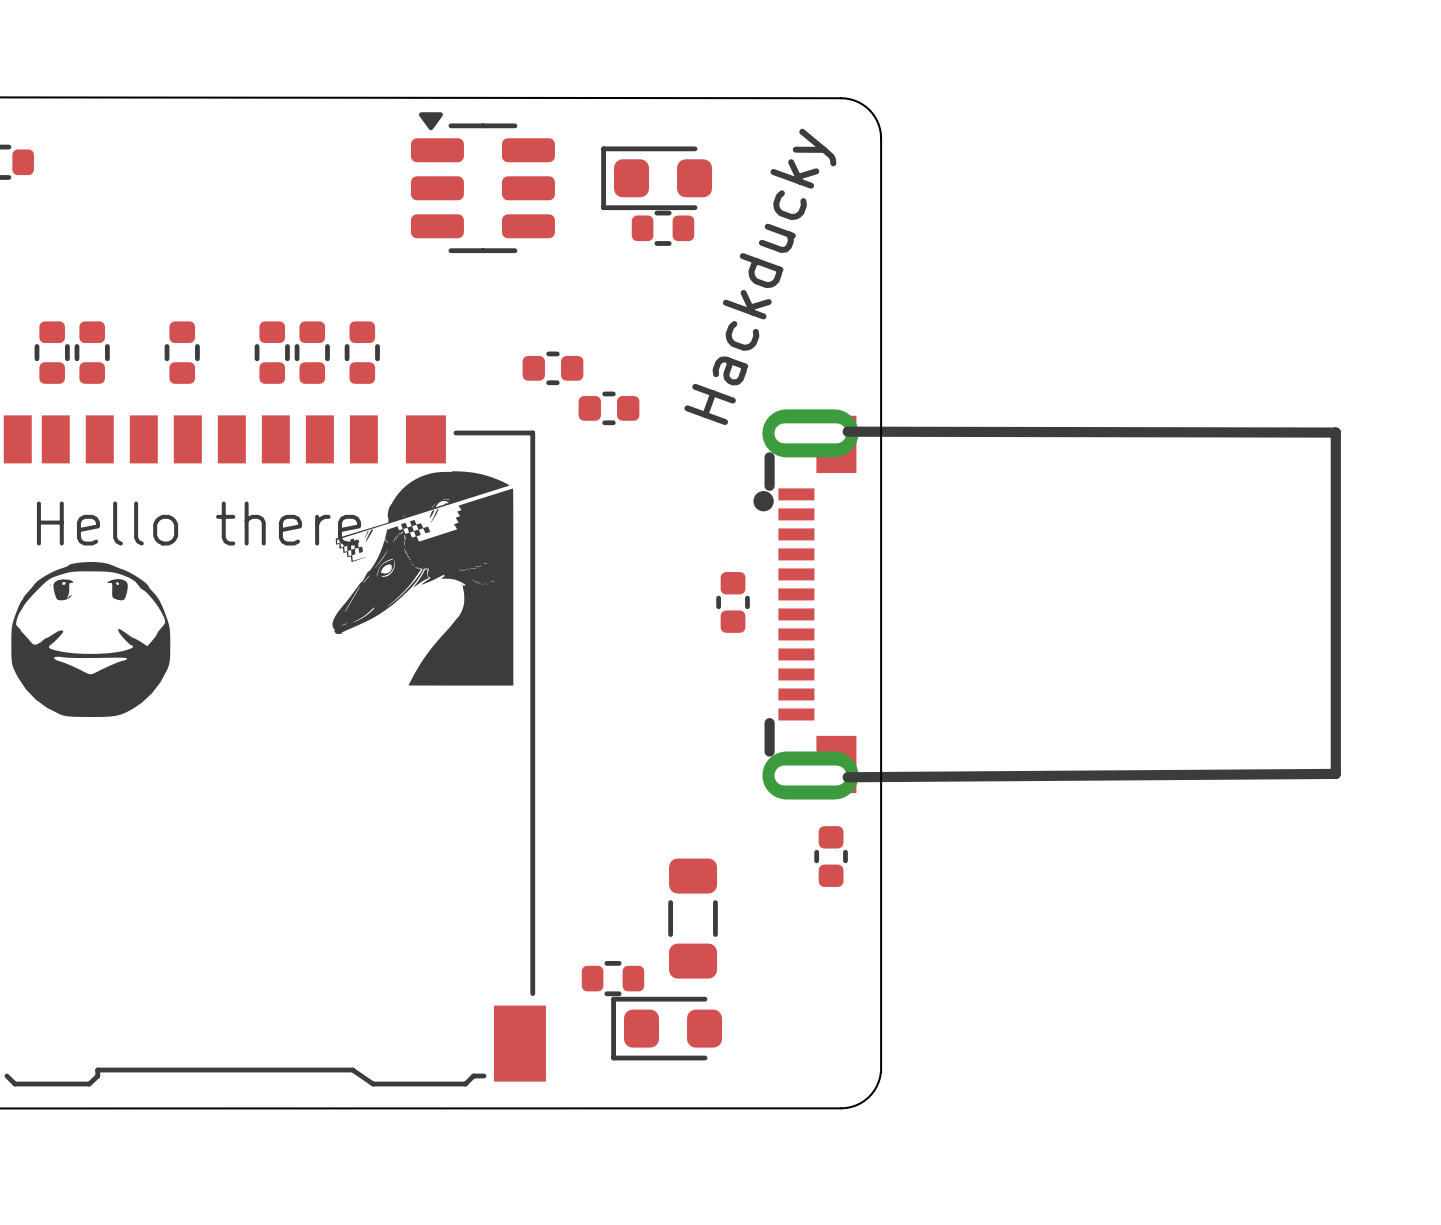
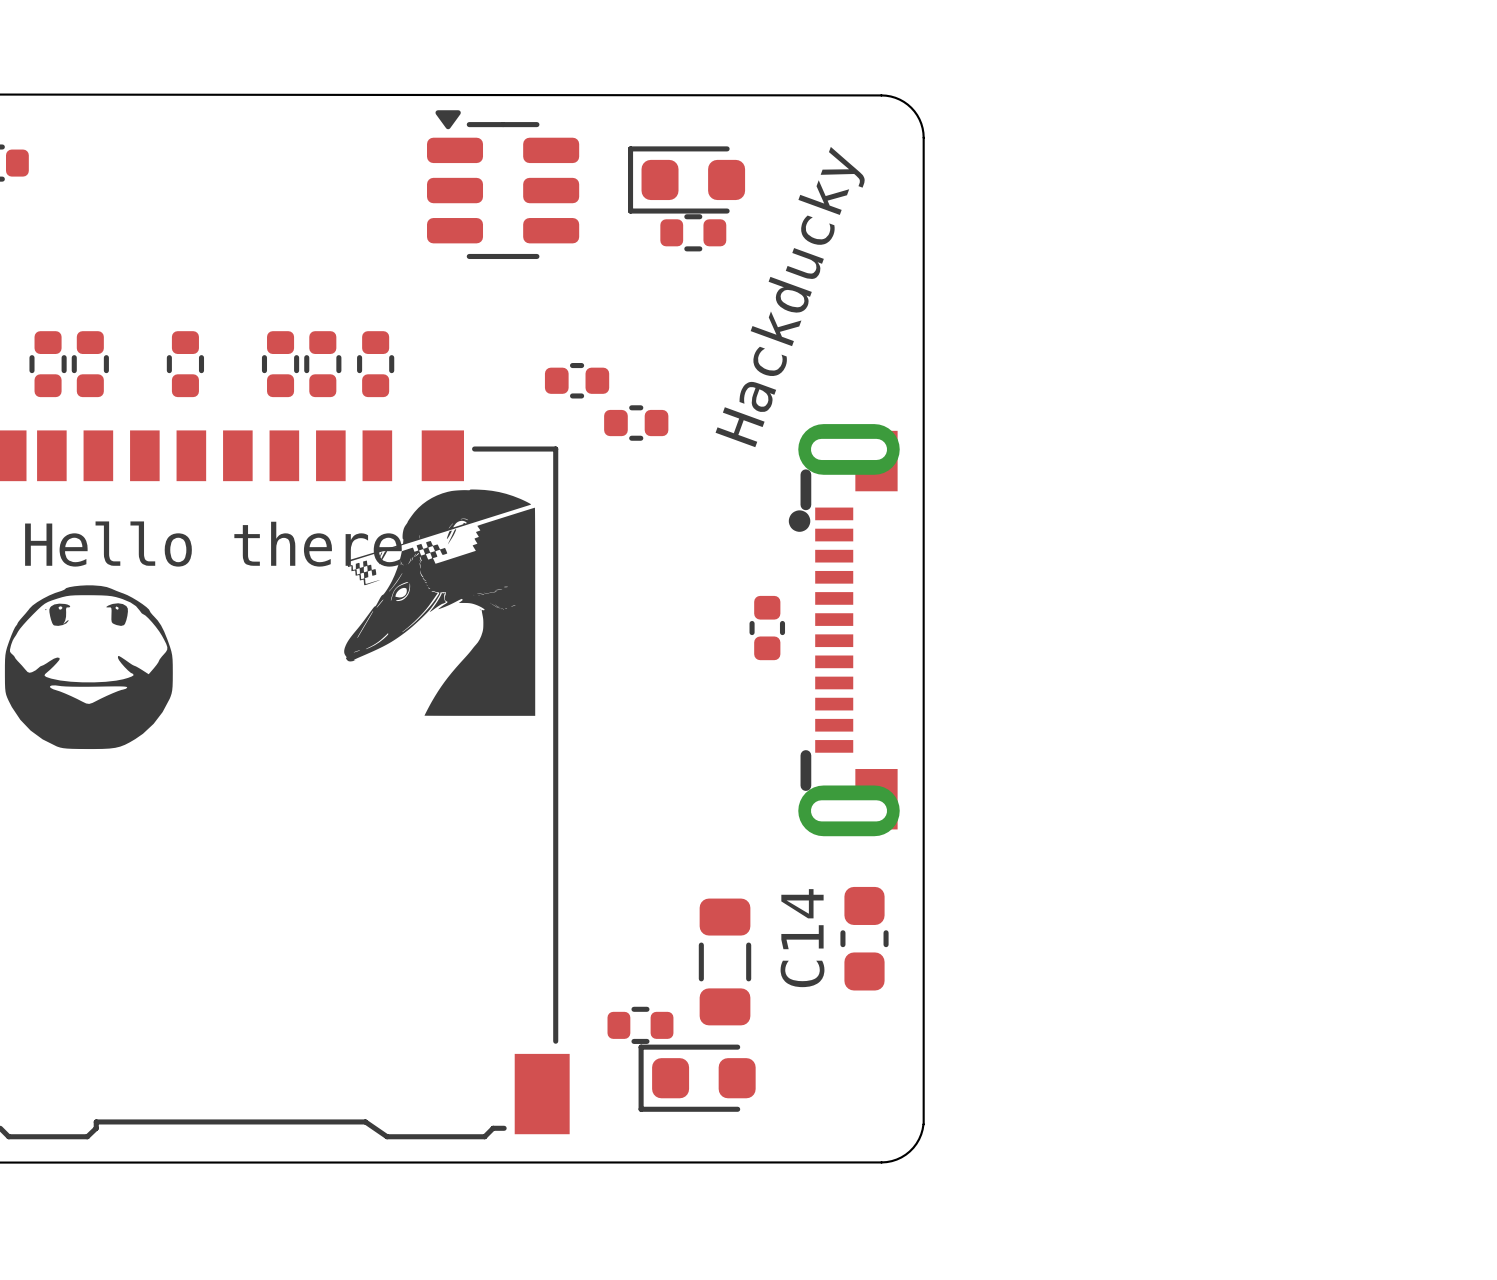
part: none -> (844, 630)
part: (1047, 604) -> none
part: (831, 856) -> none
C14: none -> (864, 938)

